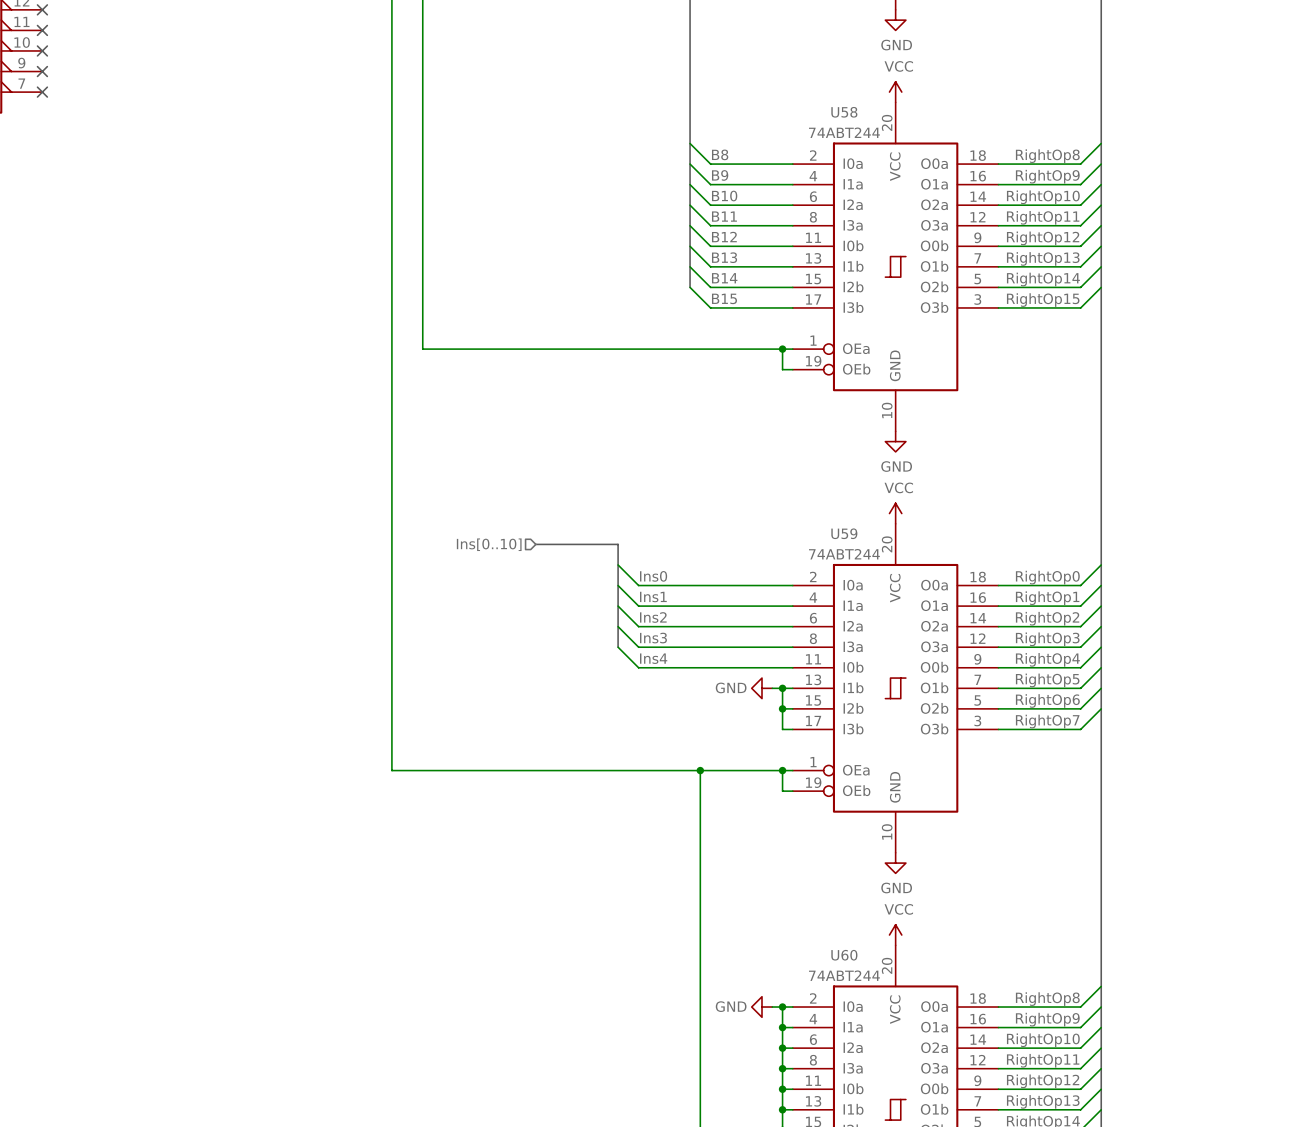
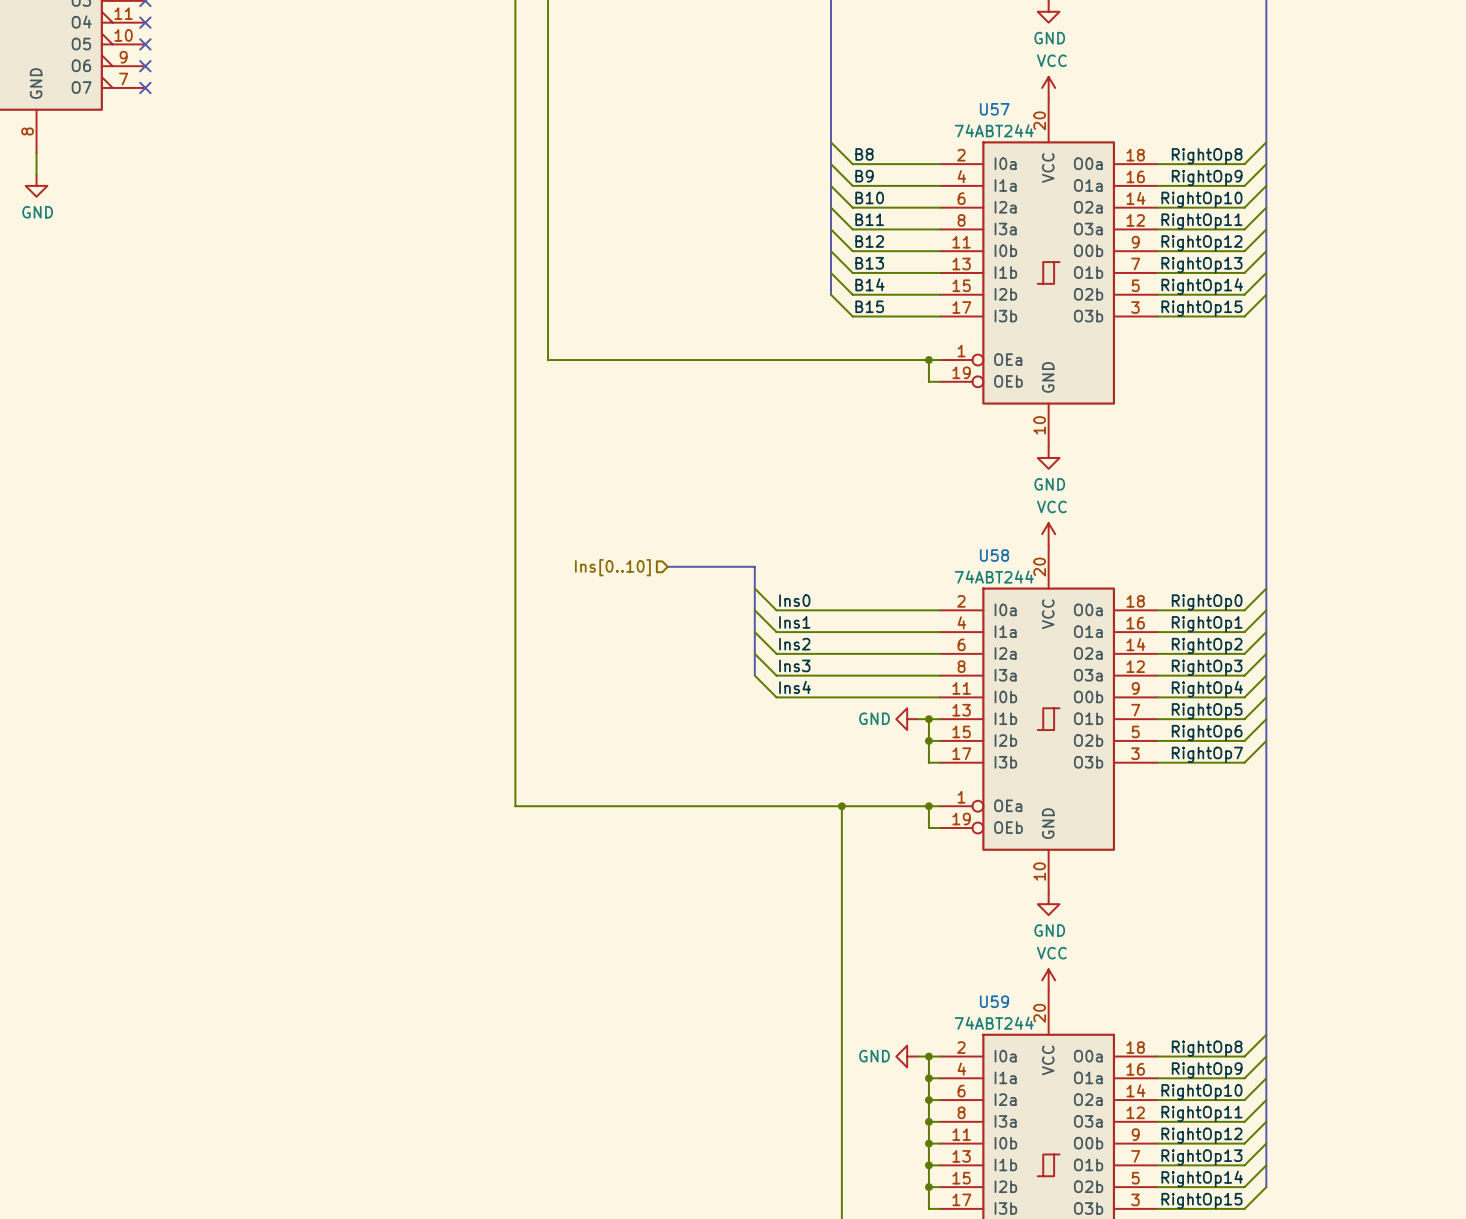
U58 name: U58 (844, 112) -> U57 (994, 109)
U59 name: U59 (844, 533) -> U58 (994, 555)
U60 name: U60 (844, 955) -> U59 (994, 1001)

